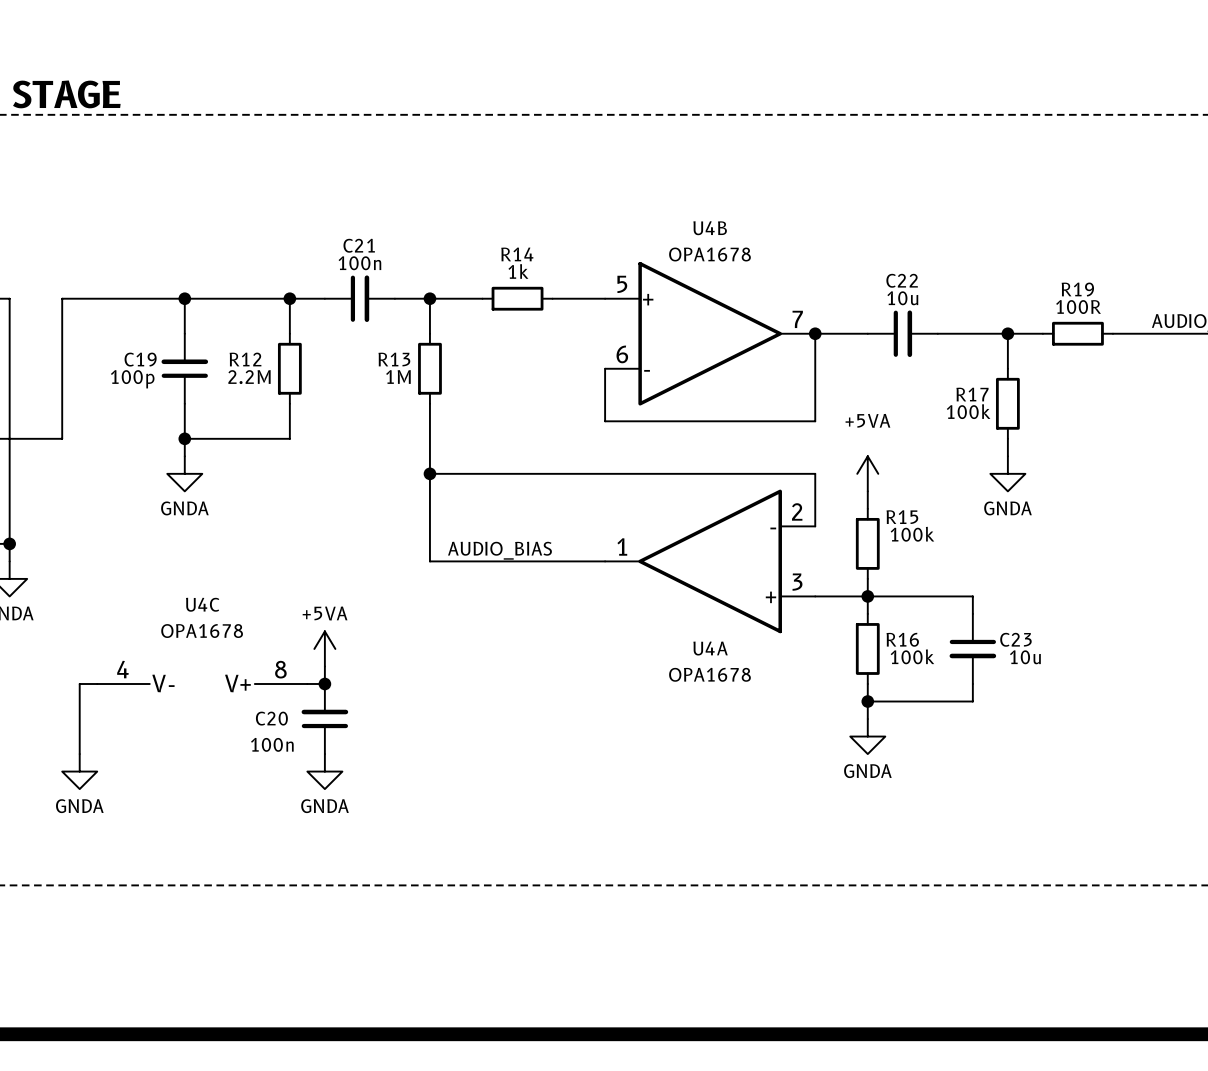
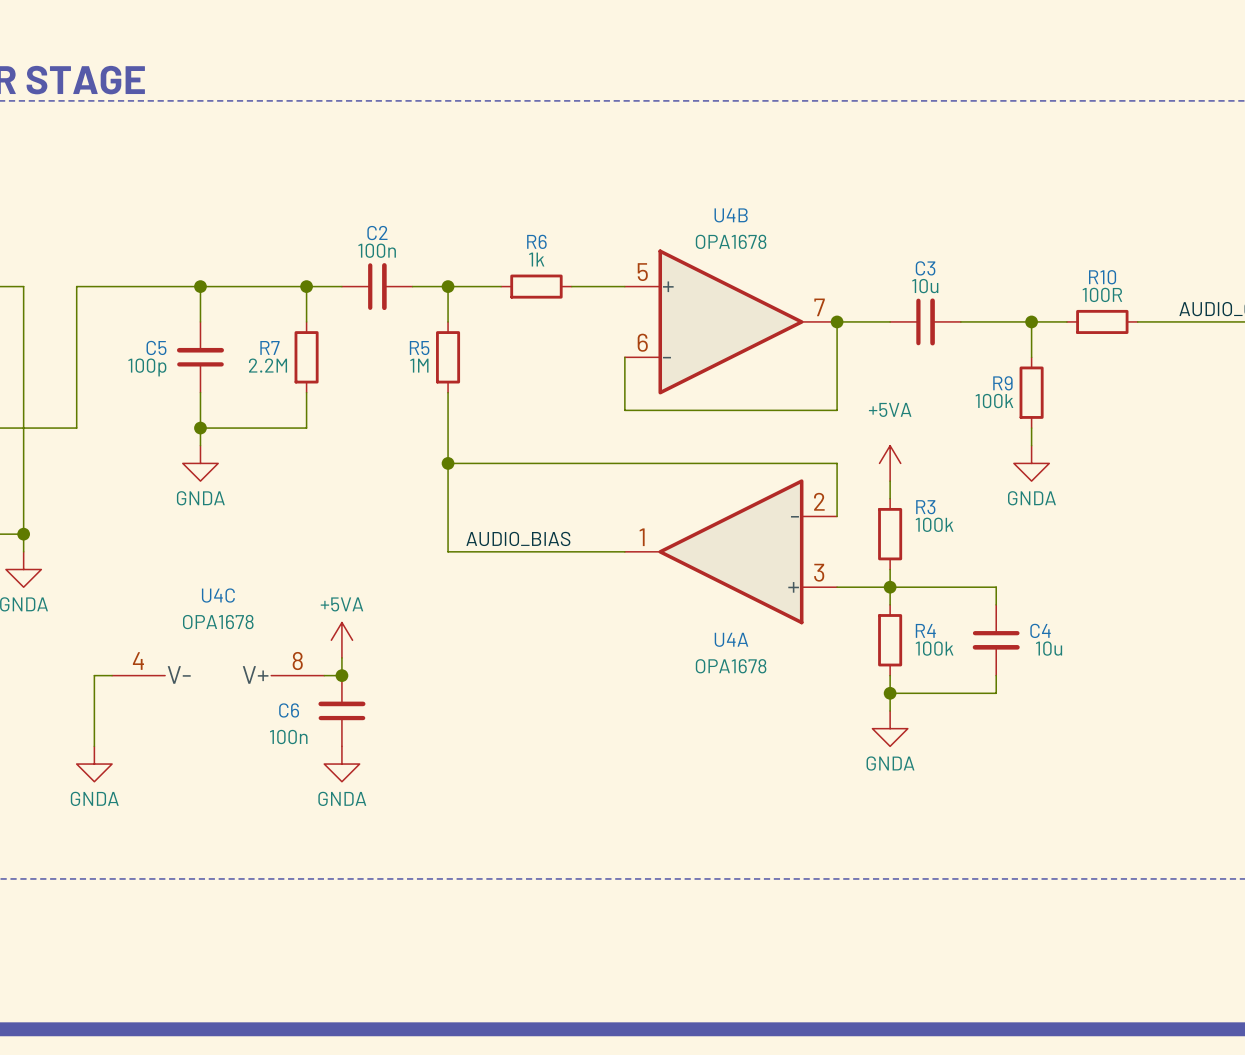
C21 name: C21 (359, 245) -> C2 (377, 233)
R14 name: R14 (517, 254) -> R6 (536, 241)
C22 name: C22 (902, 280) -> C3 (925, 268)
R19 name: R19 (1077, 289) -> R10 (1102, 277)
C19 name: C19 (140, 359) -> C5 (156, 347)
R12 name: R12 (245, 359) -> R7 (269, 347)
R13 name: R13 (394, 359) -> R5 (419, 348)
R17 name: R17 (972, 394) -> R9 (1002, 383)
R15 name: R15 (902, 517) -> R3 (925, 507)
R16 name: R16 (902, 639) -> R4 (925, 630)
C23 name: C23 (1015, 639) -> C4 (1040, 630)
C20 name: C20 (271, 718) -> C6 (289, 710)

